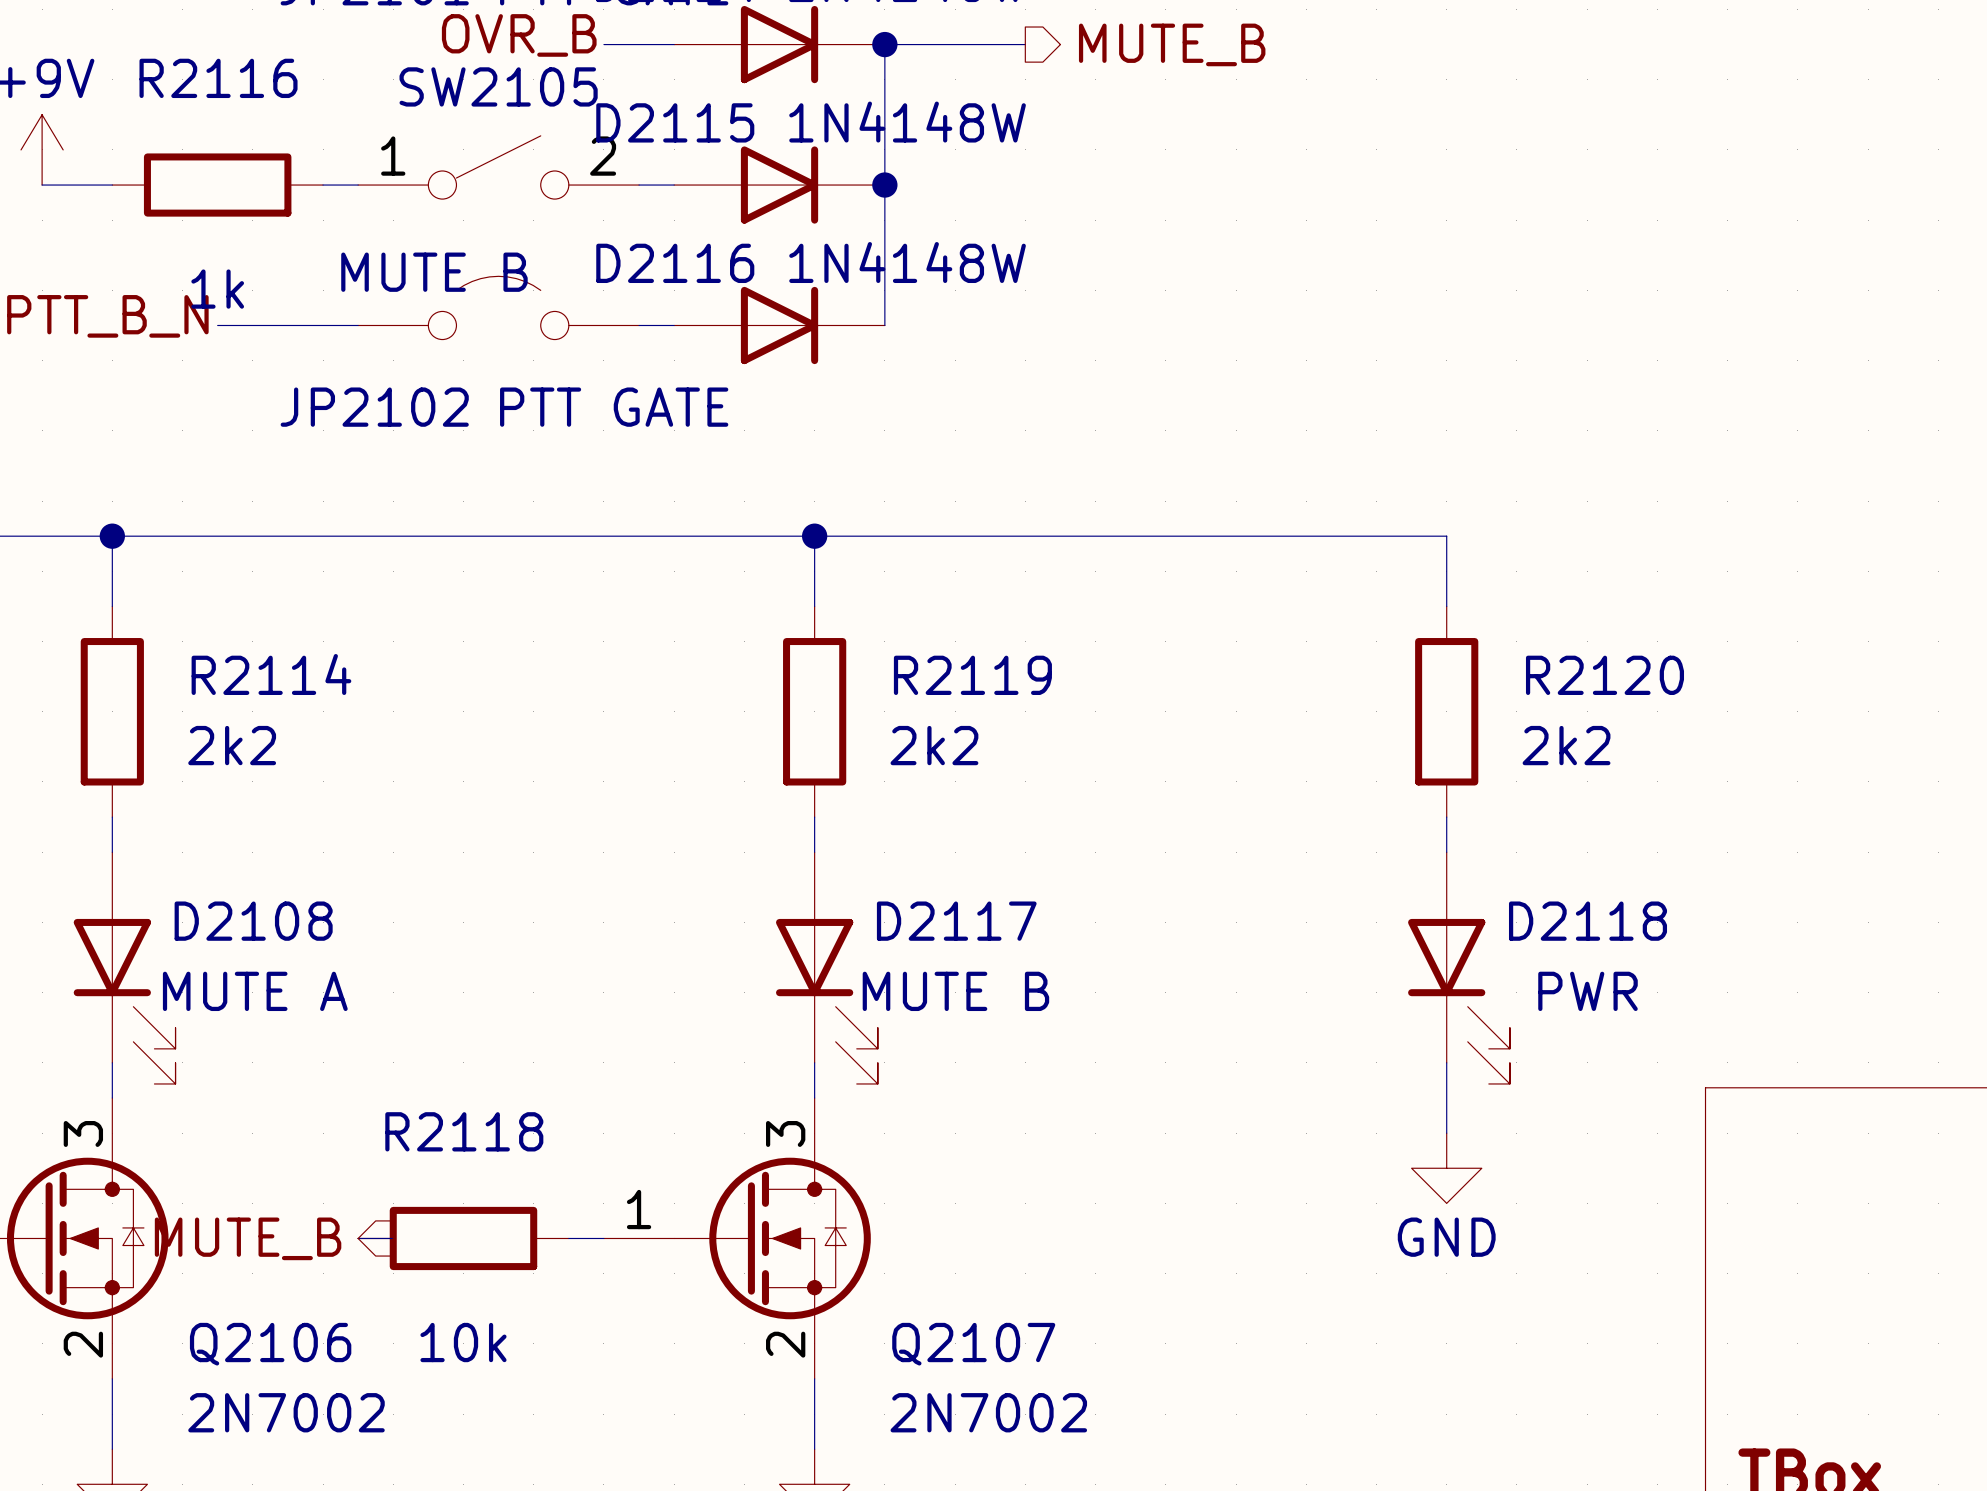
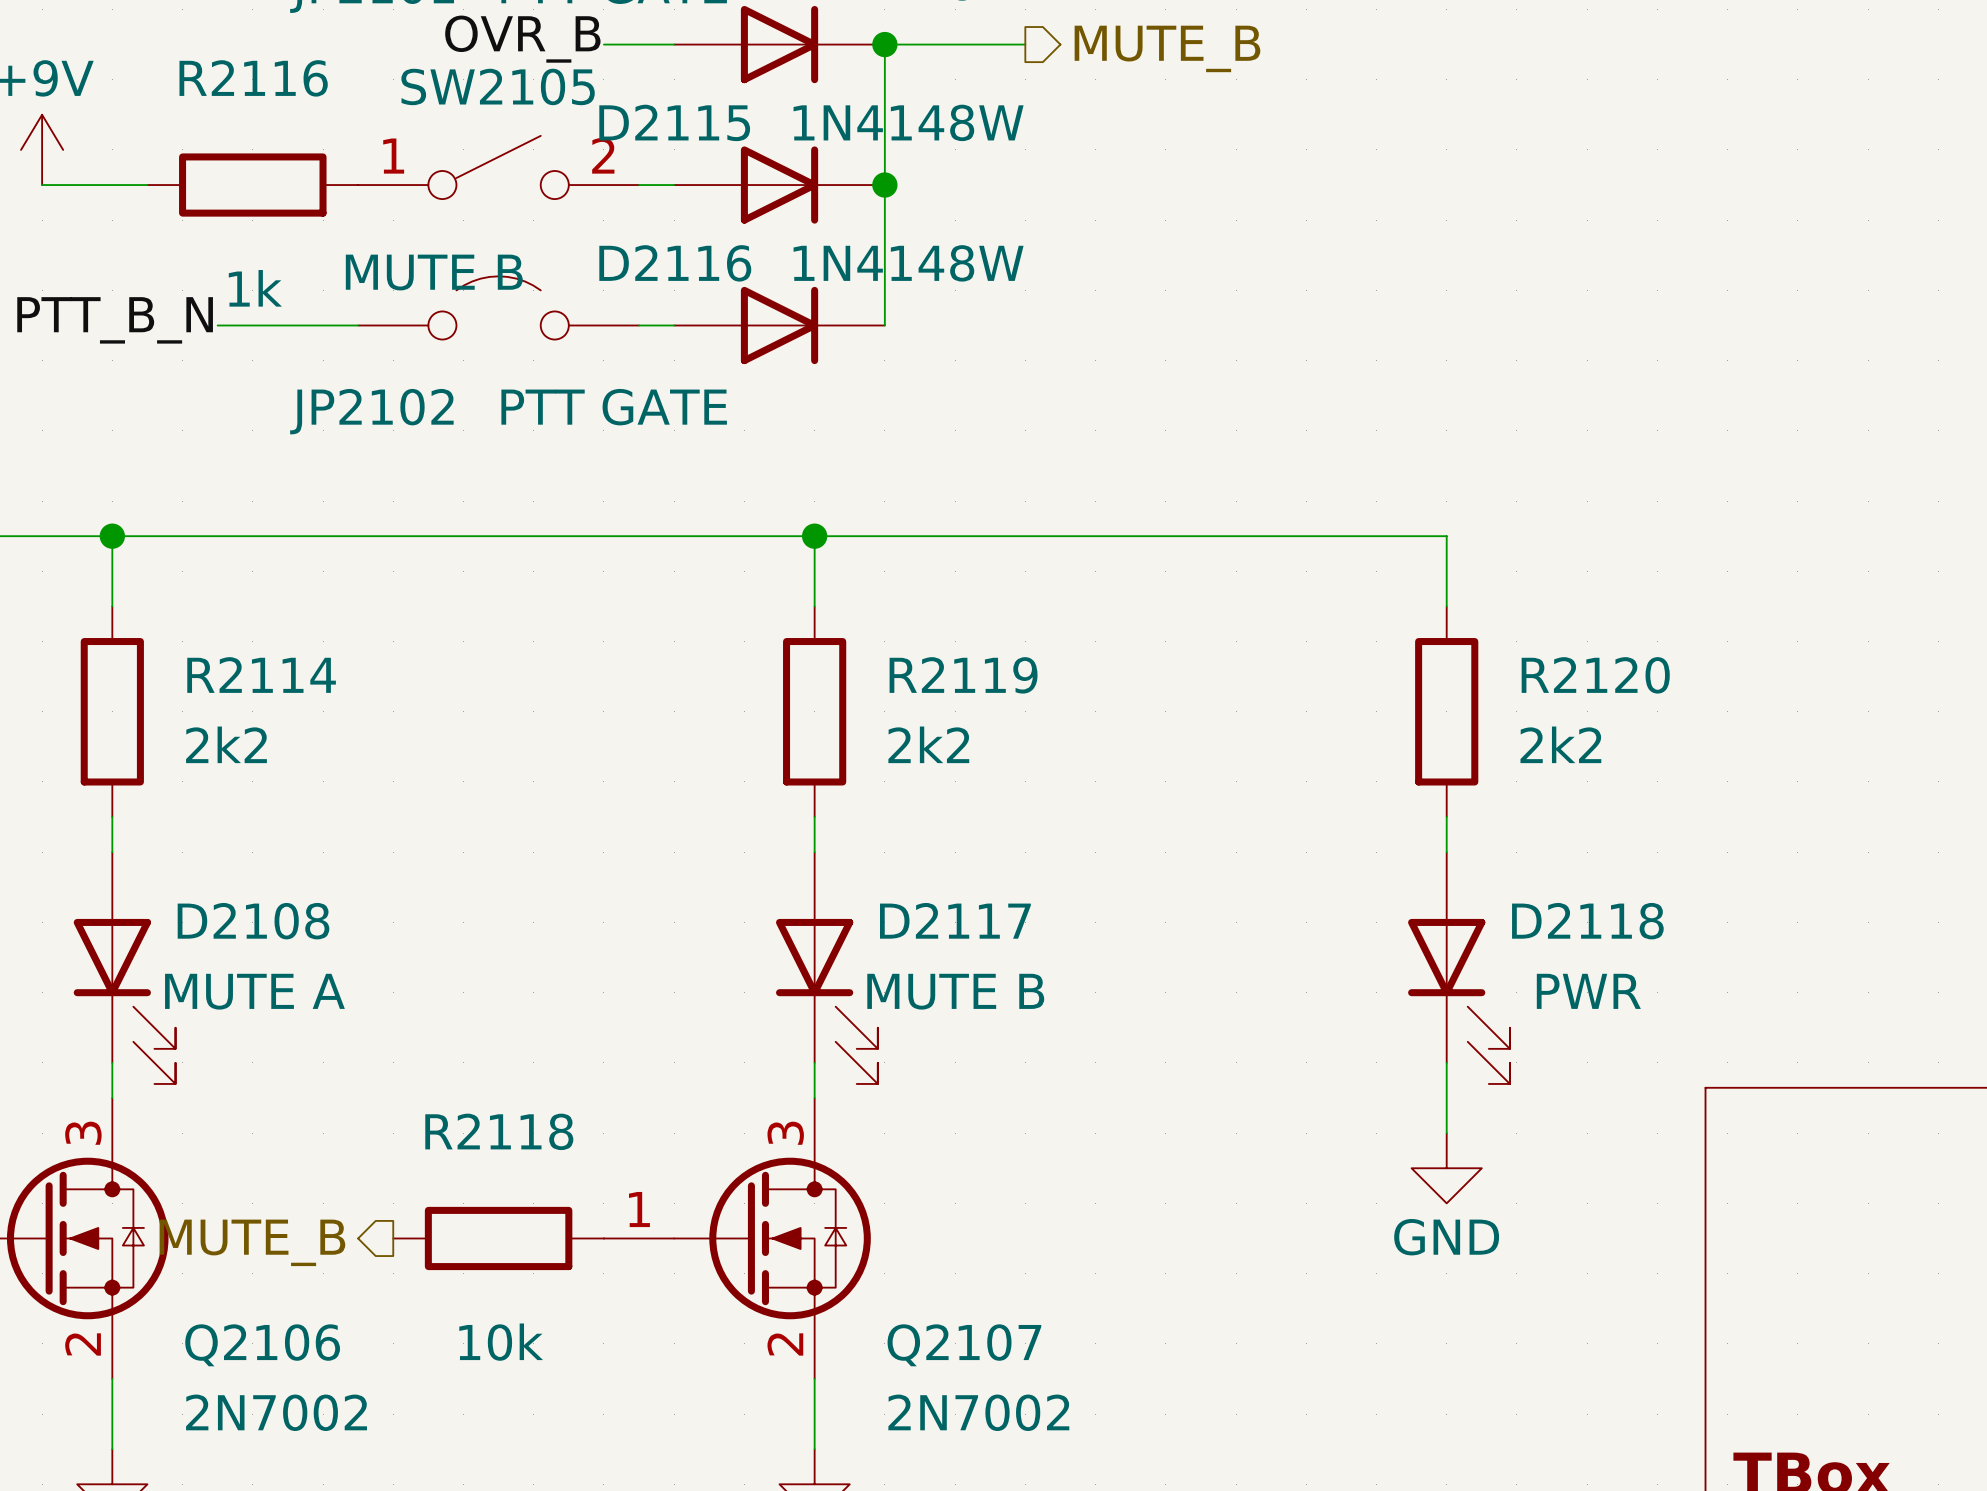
R2116 position: (217, 185) -> (252, 185)
wire: (358, 1238) (393, 1238) -> none
R2118 position: (463, 1238) -> (498, 1238)

